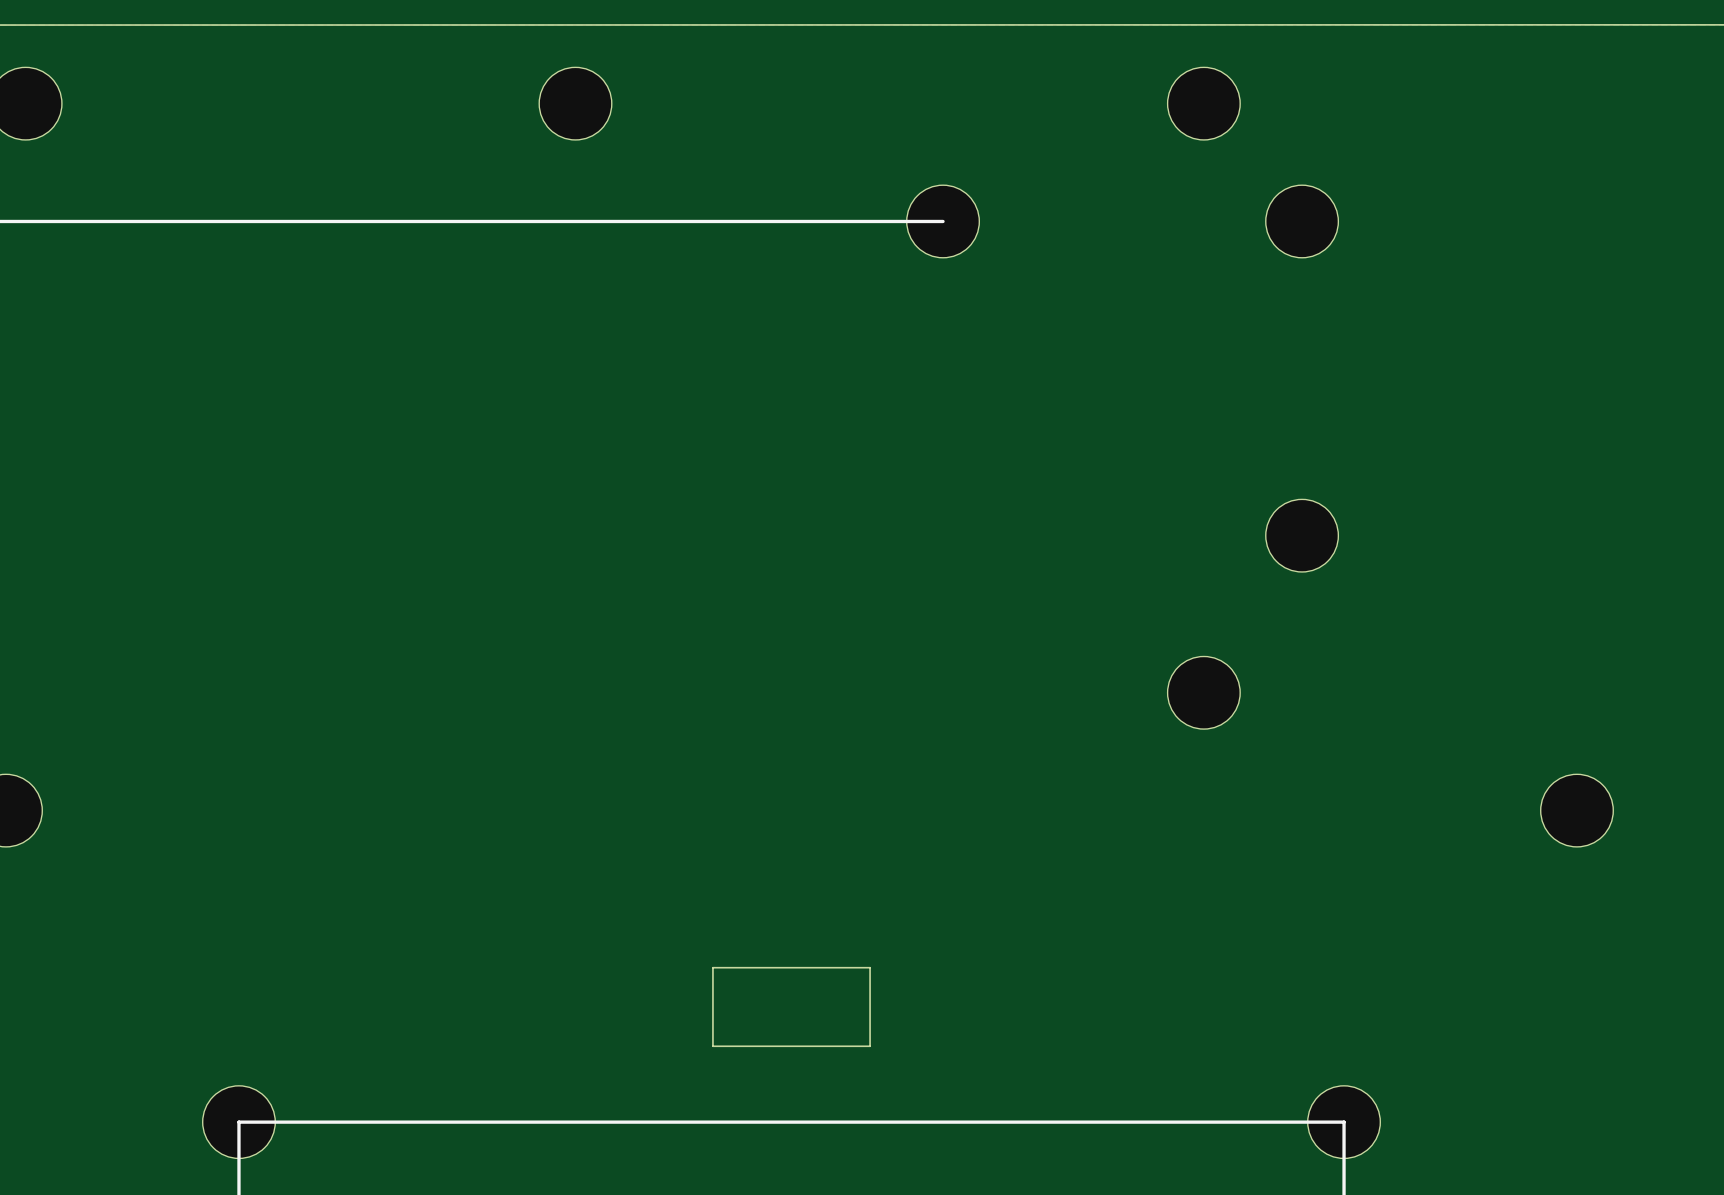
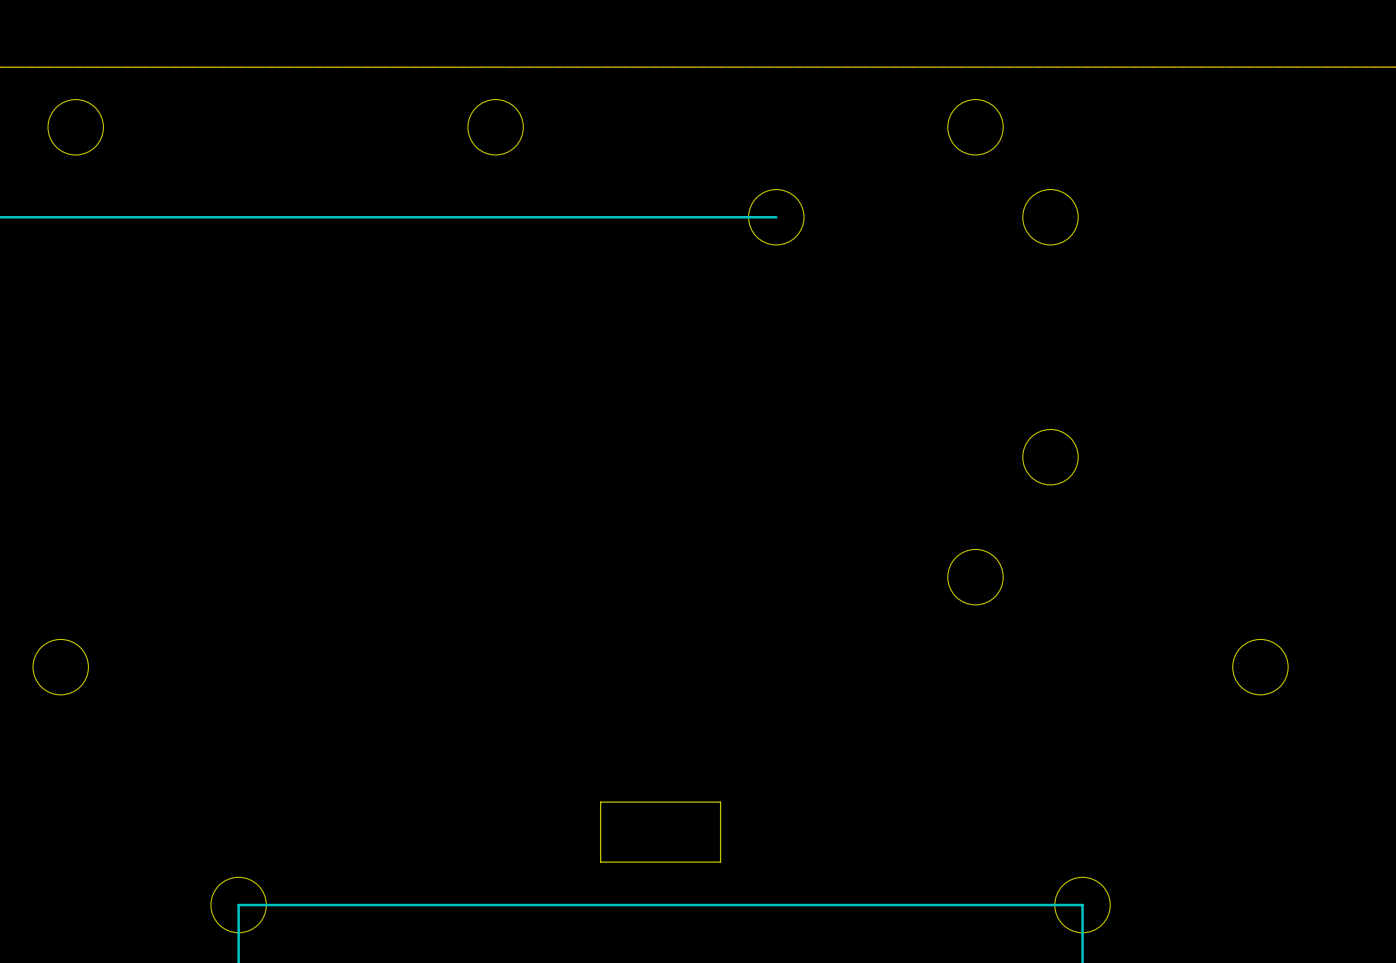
board edge: (712, 987) (712, 967) (870, 967) (870, 987) -> (600, 802) (720, 802)
board edge: (712, 1046) (870, 1046) -> (600, 847) (600, 862) (720, 862) (720, 847)

